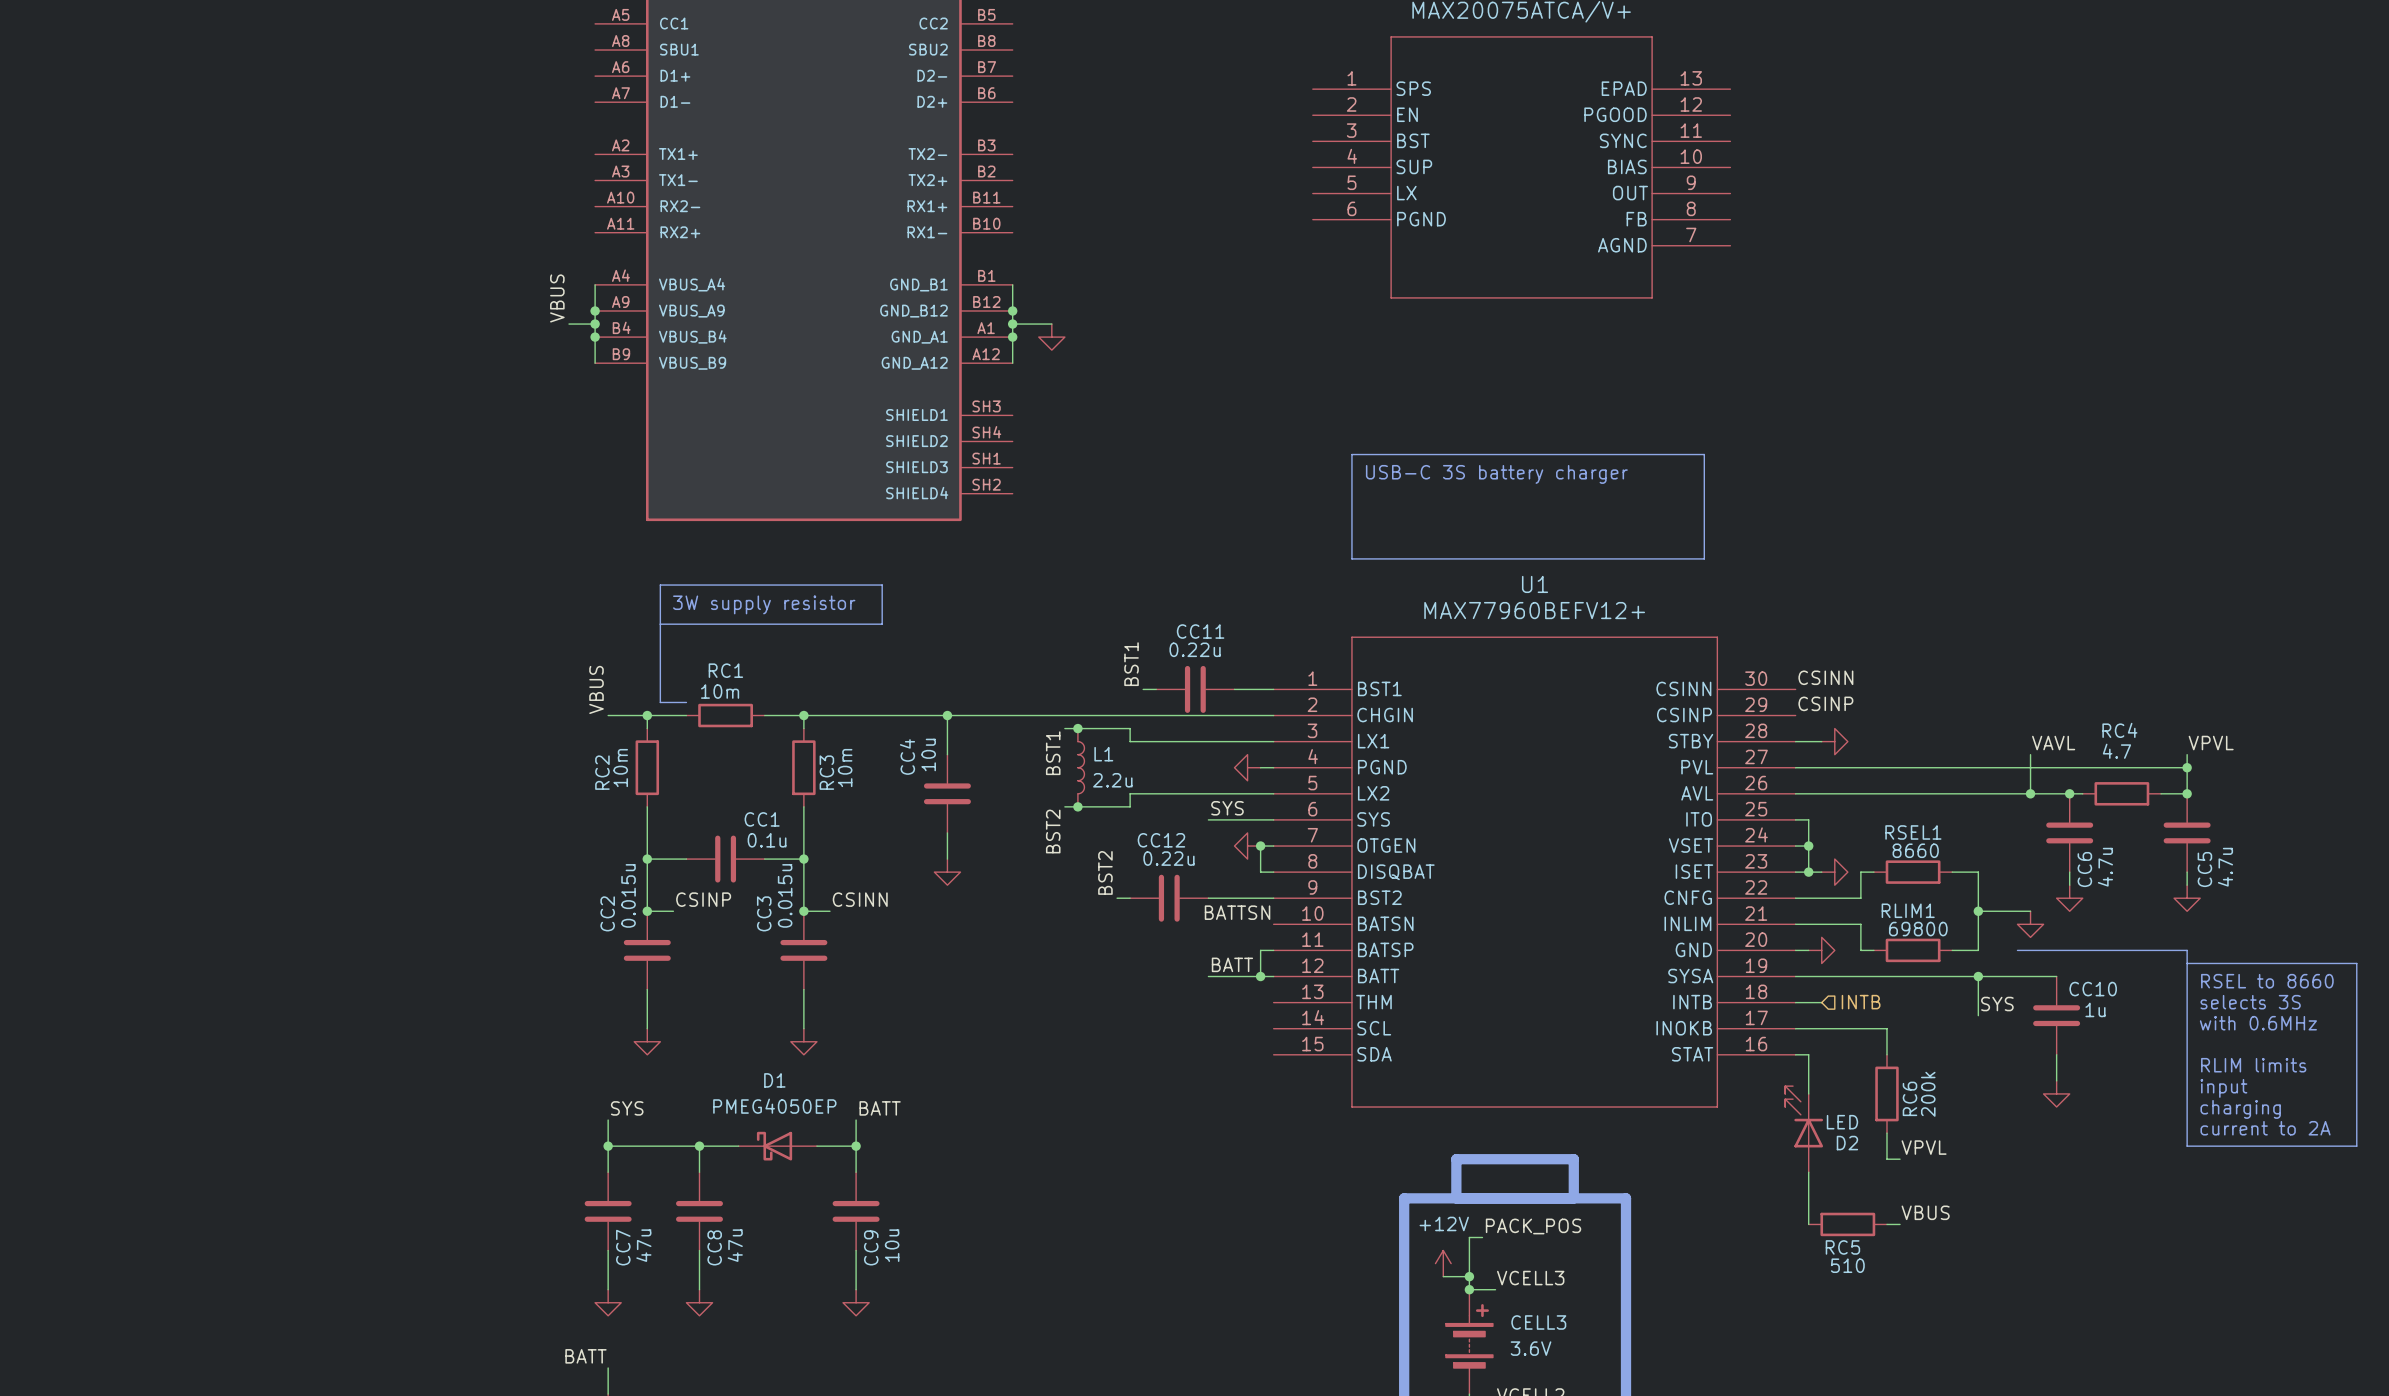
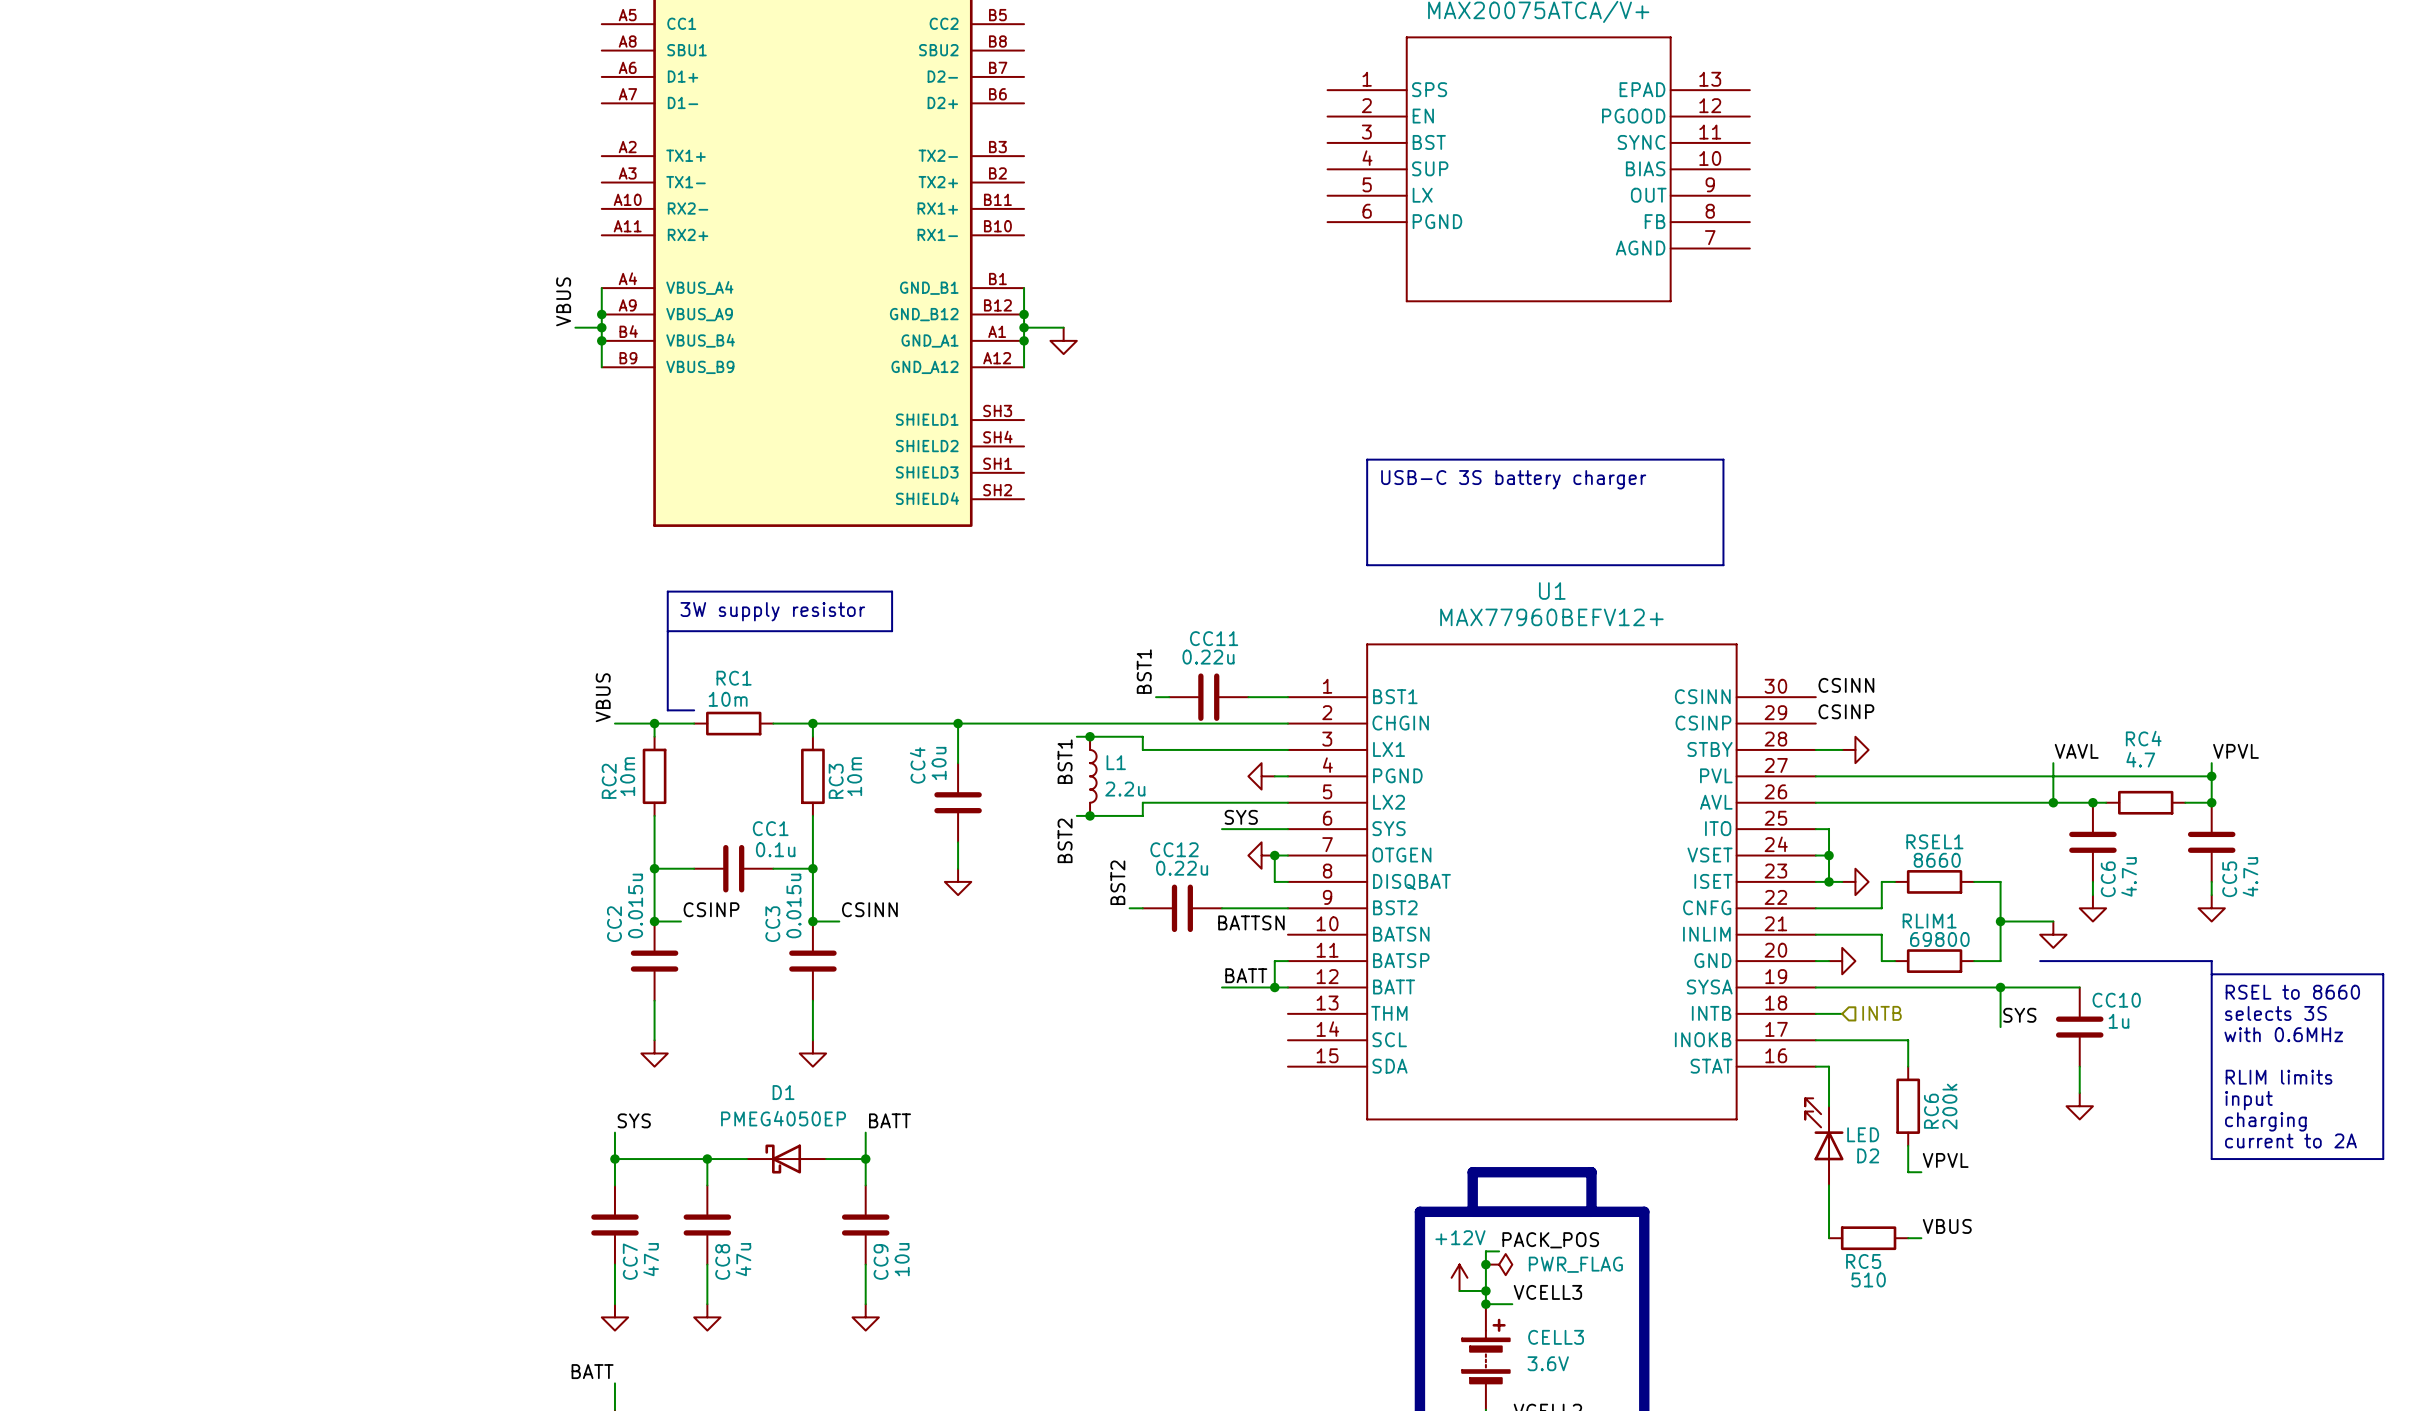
junction: none -> (1485, 1264)
power symbol: none -> PWR_FLAG (1499, 1264)

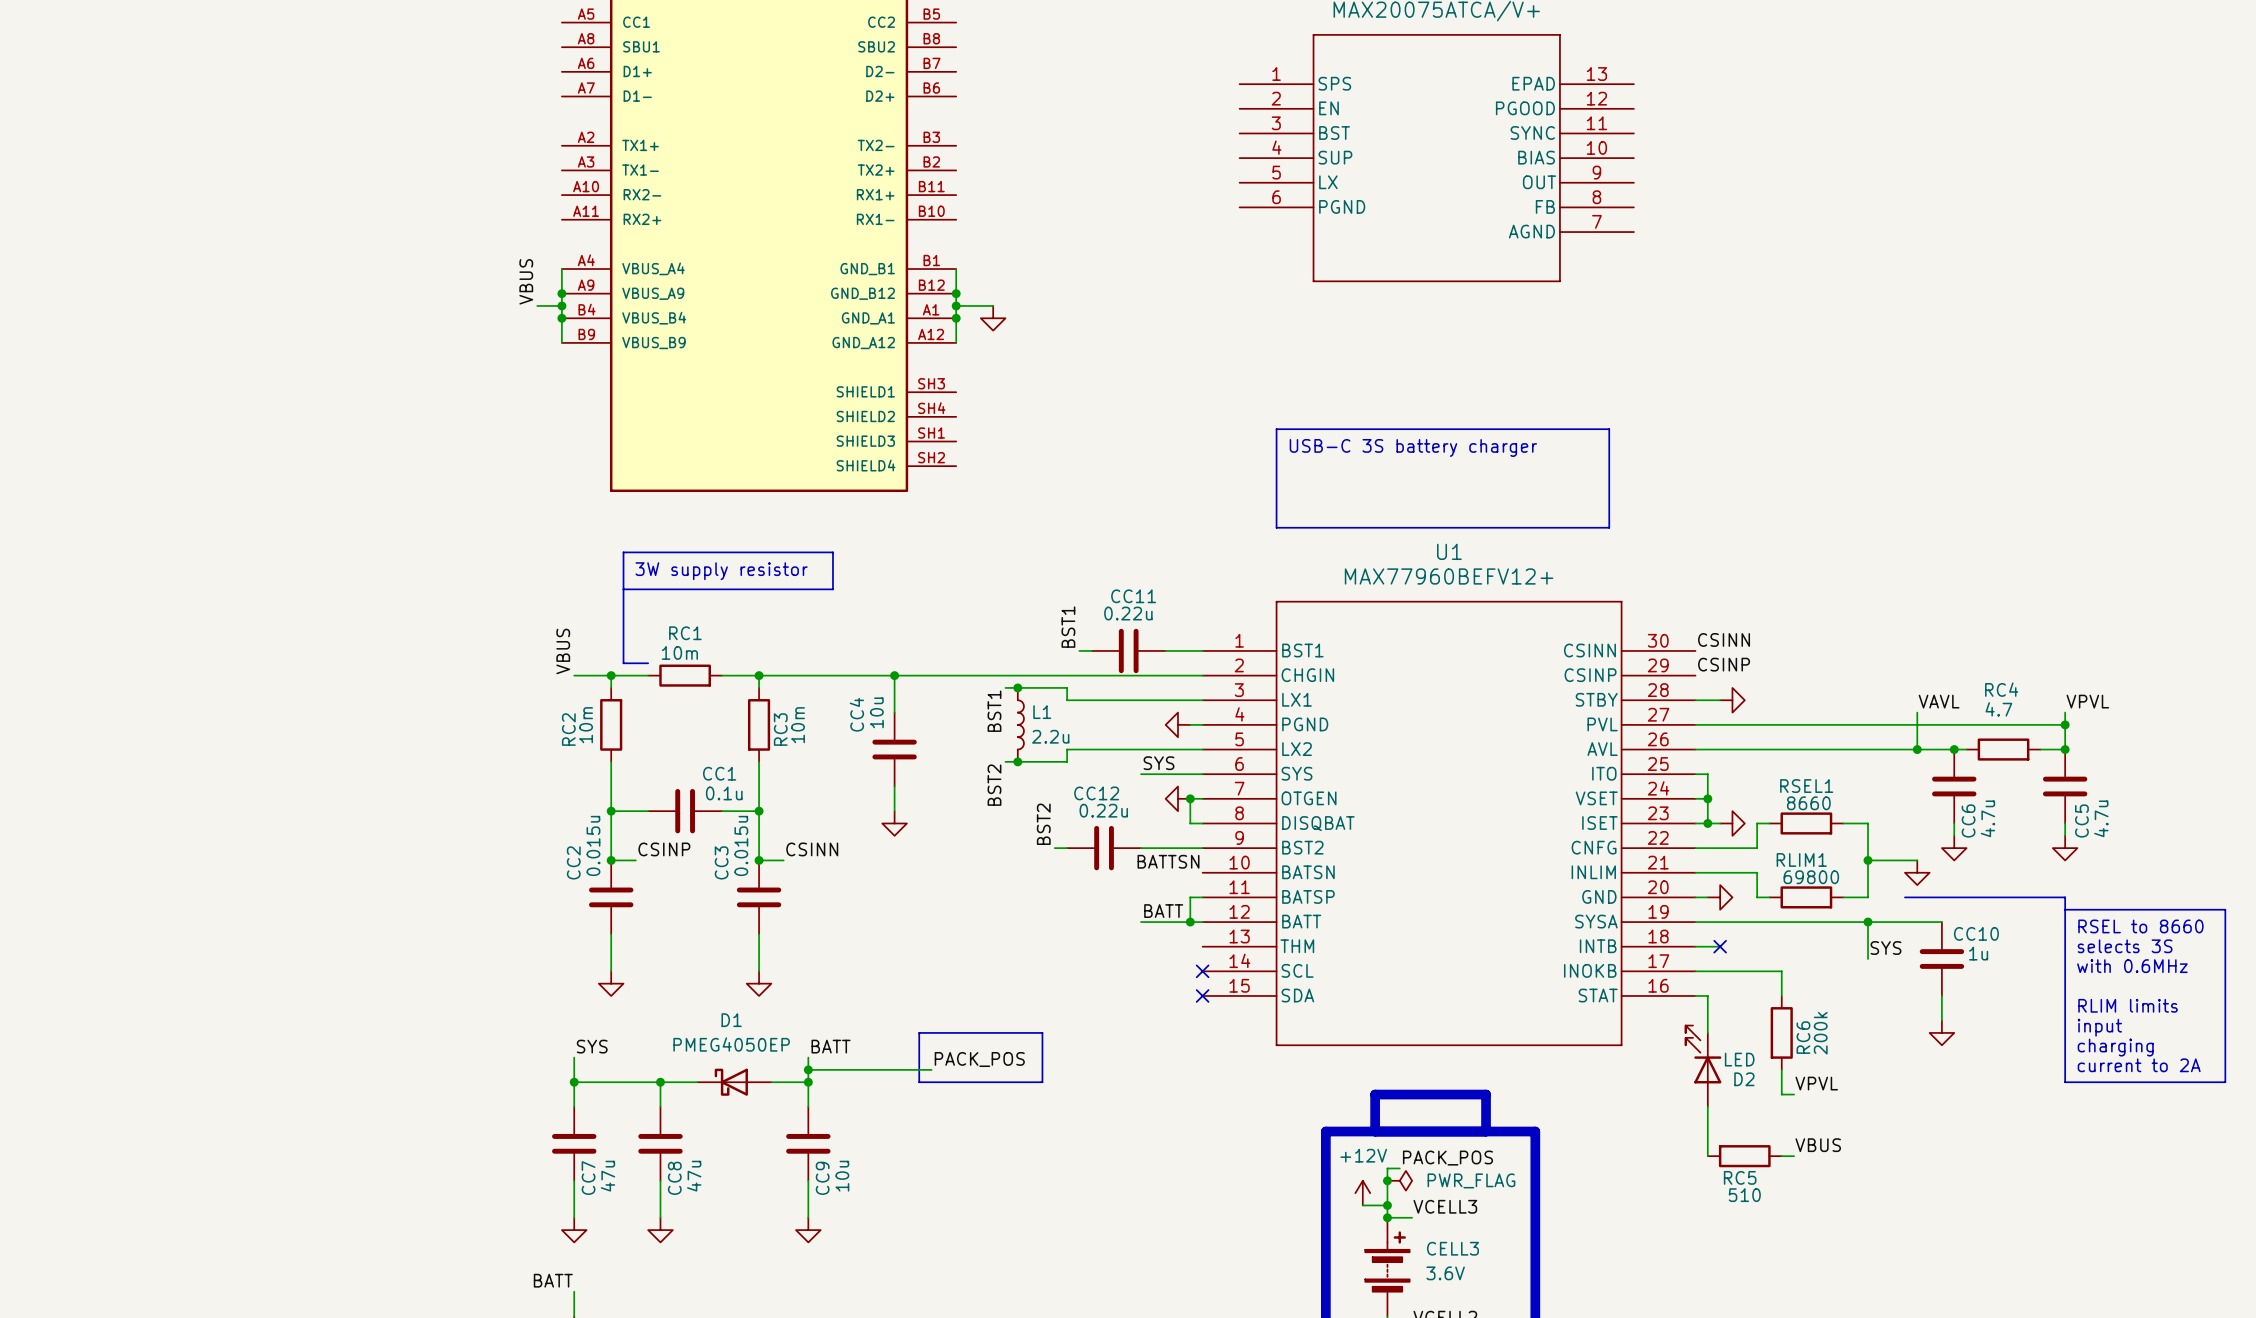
no-connect mark: none -> (1720, 946)
hierarchical label: INTB (1882, 1013) -> none
no-connect mark: none -> (1202, 971)
no-connect mark: none -> (1202, 995)
line: none -> (919, 1032) (1042, 1032) (1042, 1082) (919, 1082) (919, 1032)
label: none -> PACK_POS (979, 1059)
wire: none -> (808, 1069) (931, 1069)
junction: none -> (808, 1069)

